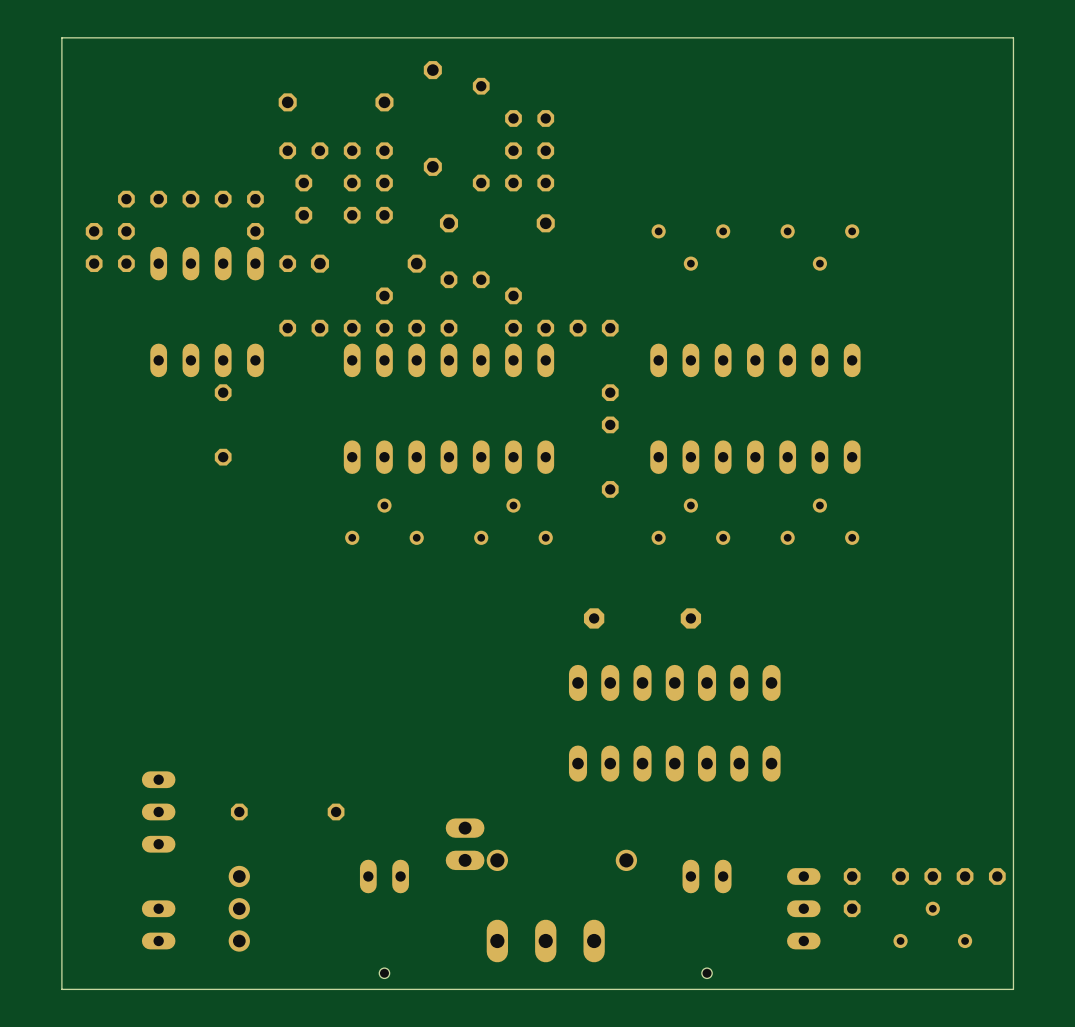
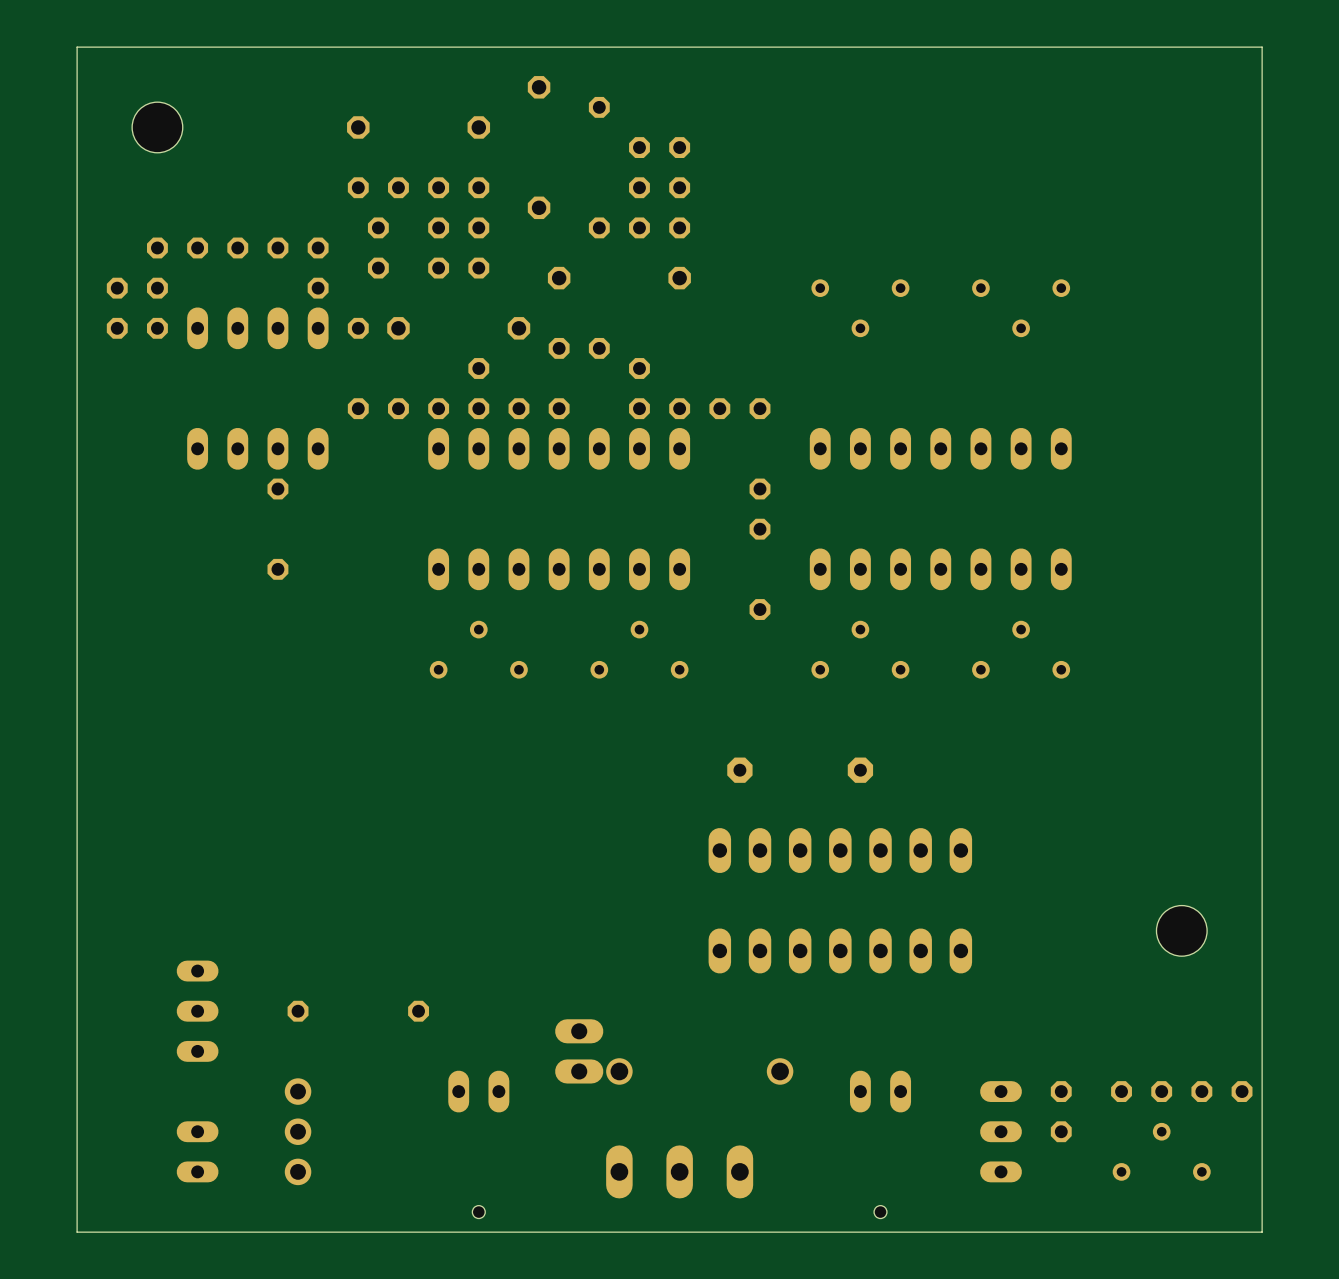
hole: none -> (157, 127)
hole: none -> (1181, 930)

